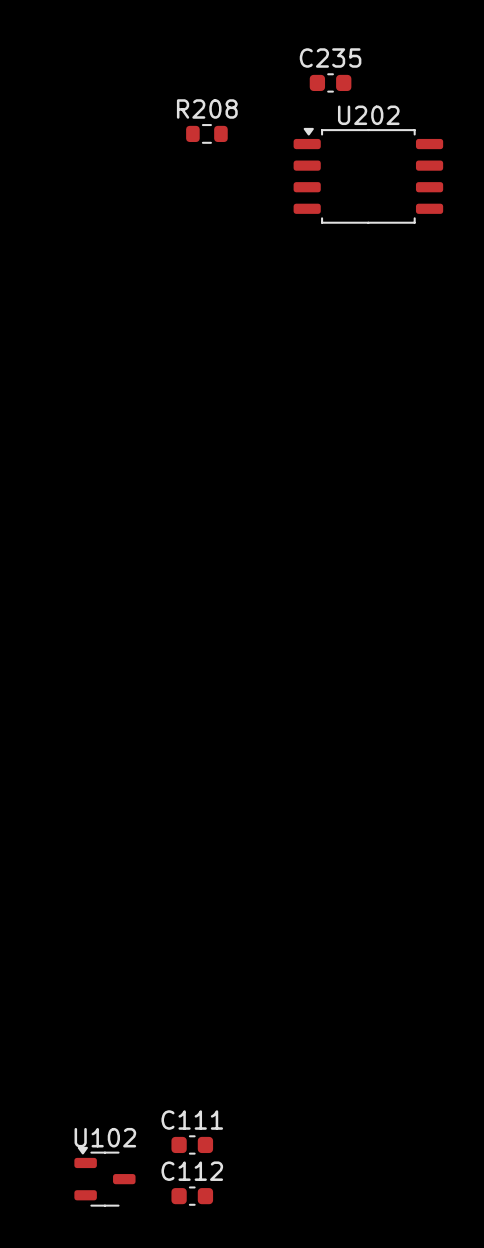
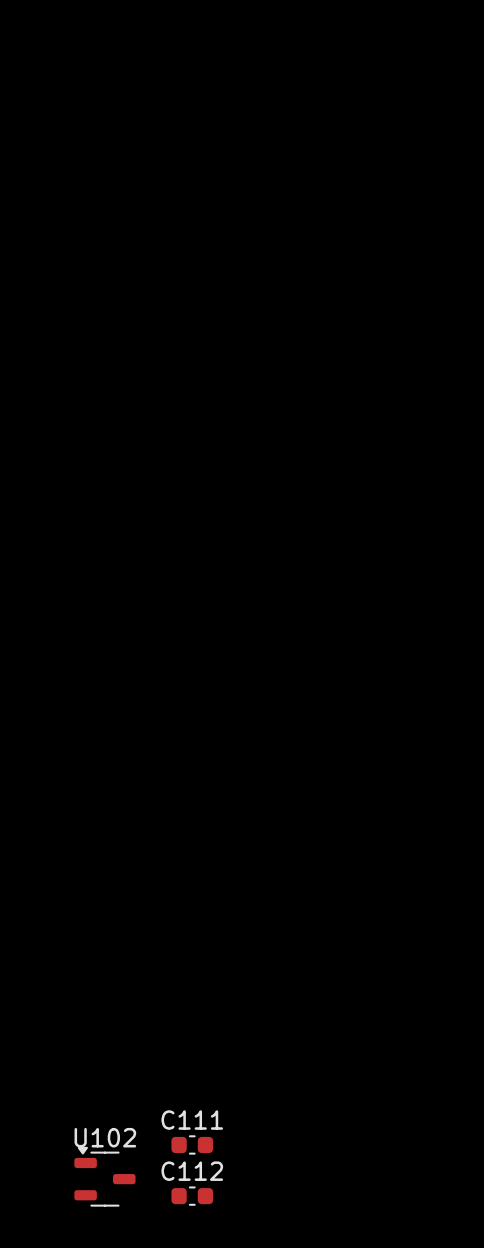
C235: (330, 82) -> none
R208: (206, 133) -> none
U202: (368, 175) -> none

